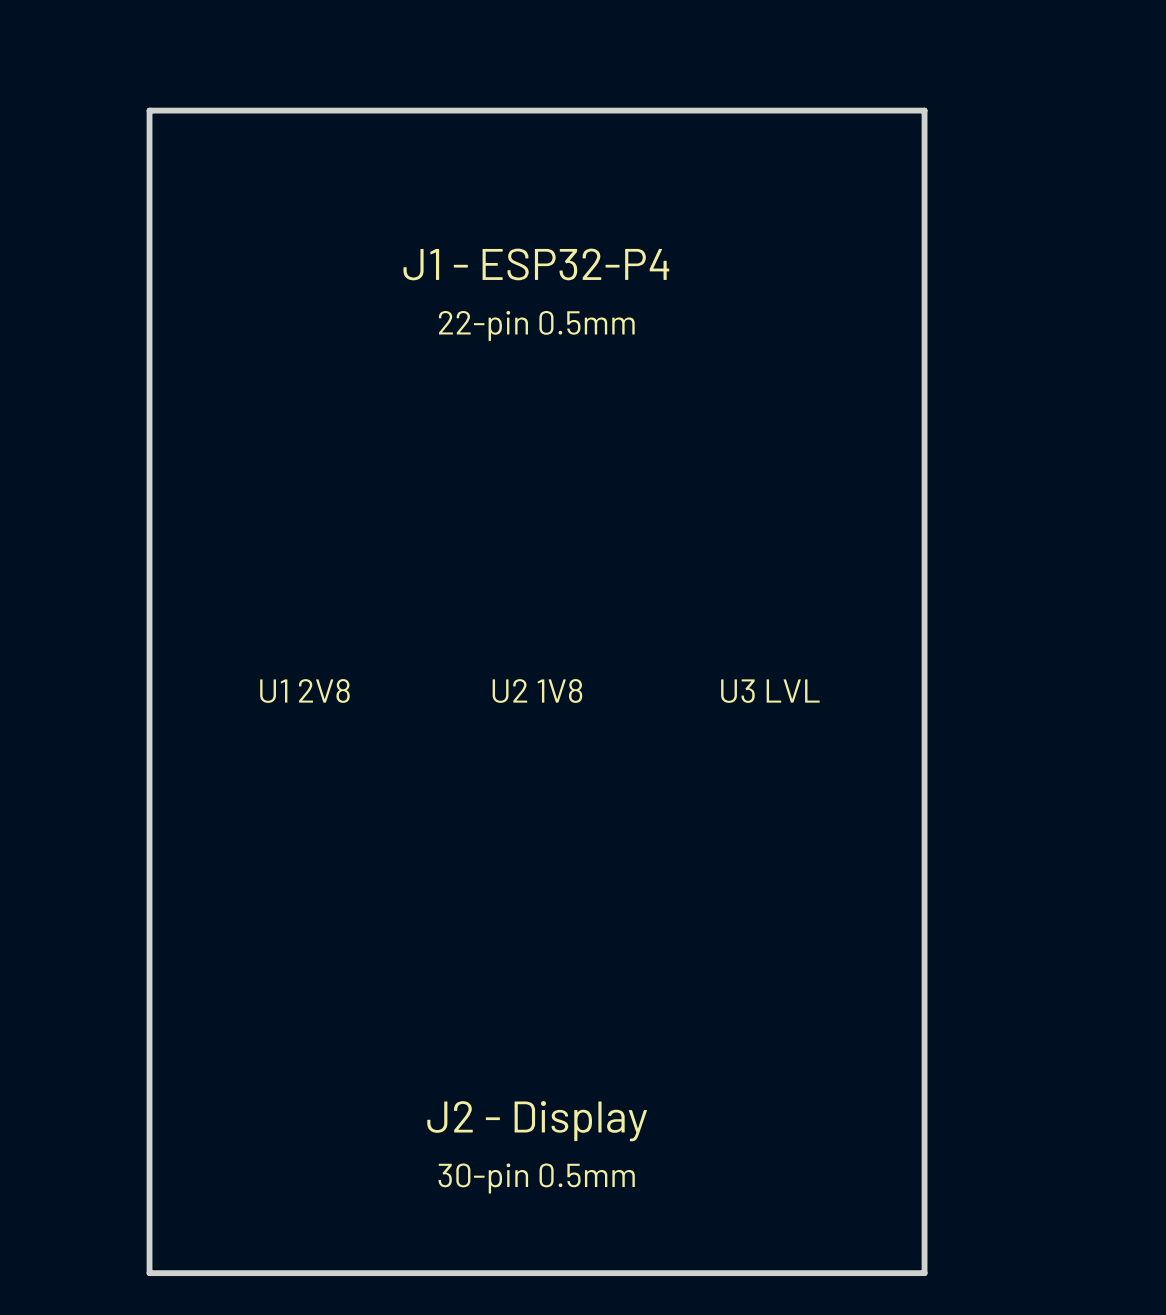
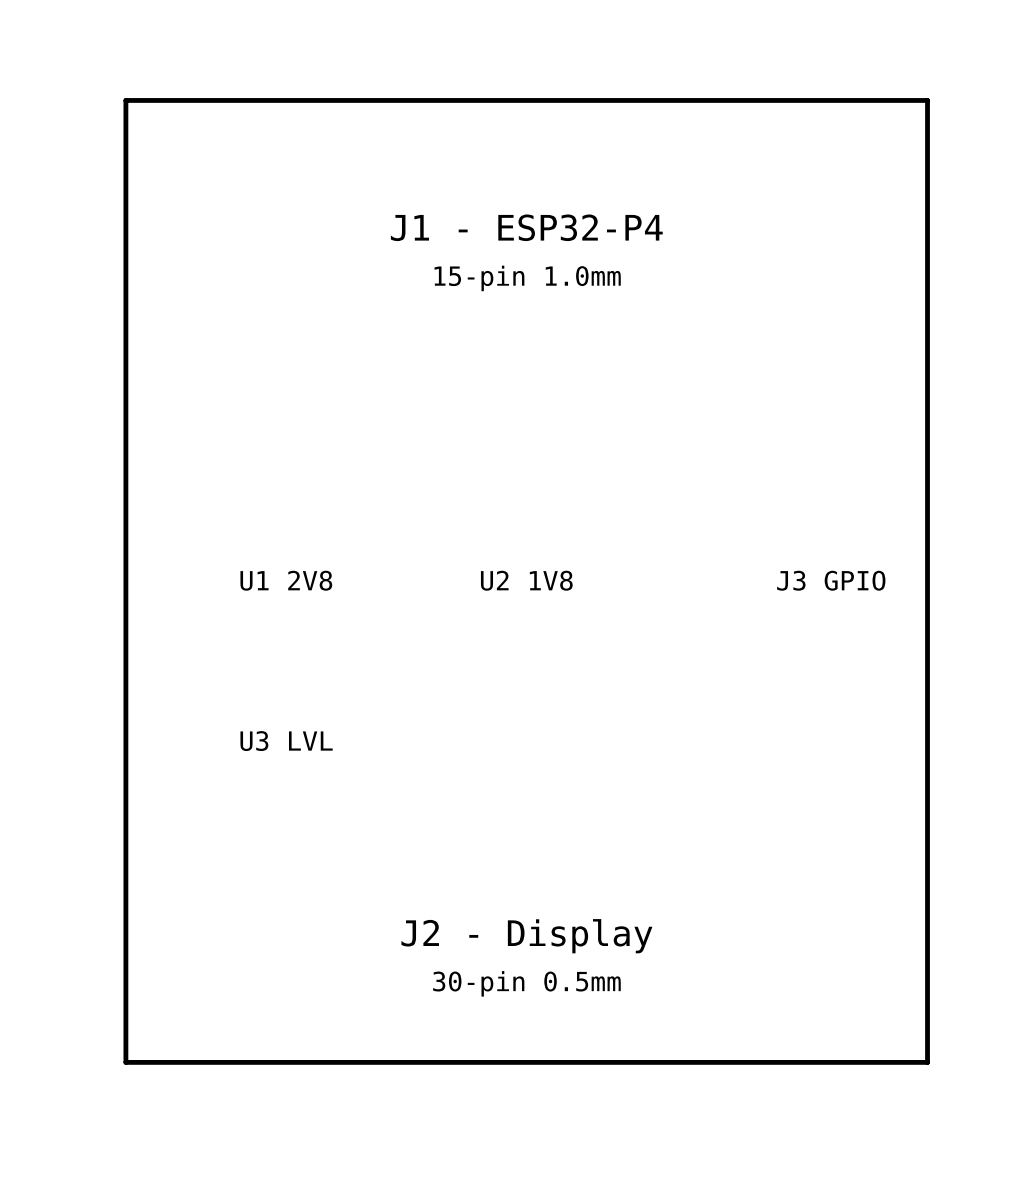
board edge: (149, 110) (149, 1273) -> (206, 100) (125, 100) (125, 1062) (206, 1062)
board edge: (924, 110) (924, 1273) -> (847, 100) (927, 100) (927, 1062) (847, 1062)
text: 22-pin 0.5mm (536, 325) -> 15-pin 1.0mm (527, 278)
text position: U1 2V8 (304, 690) -> U1 2V8 (286, 580)
text position: U3 LVL (770, 691) -> U3 LVL (286, 741)
text: none -> J3 GPIO (831, 580)

